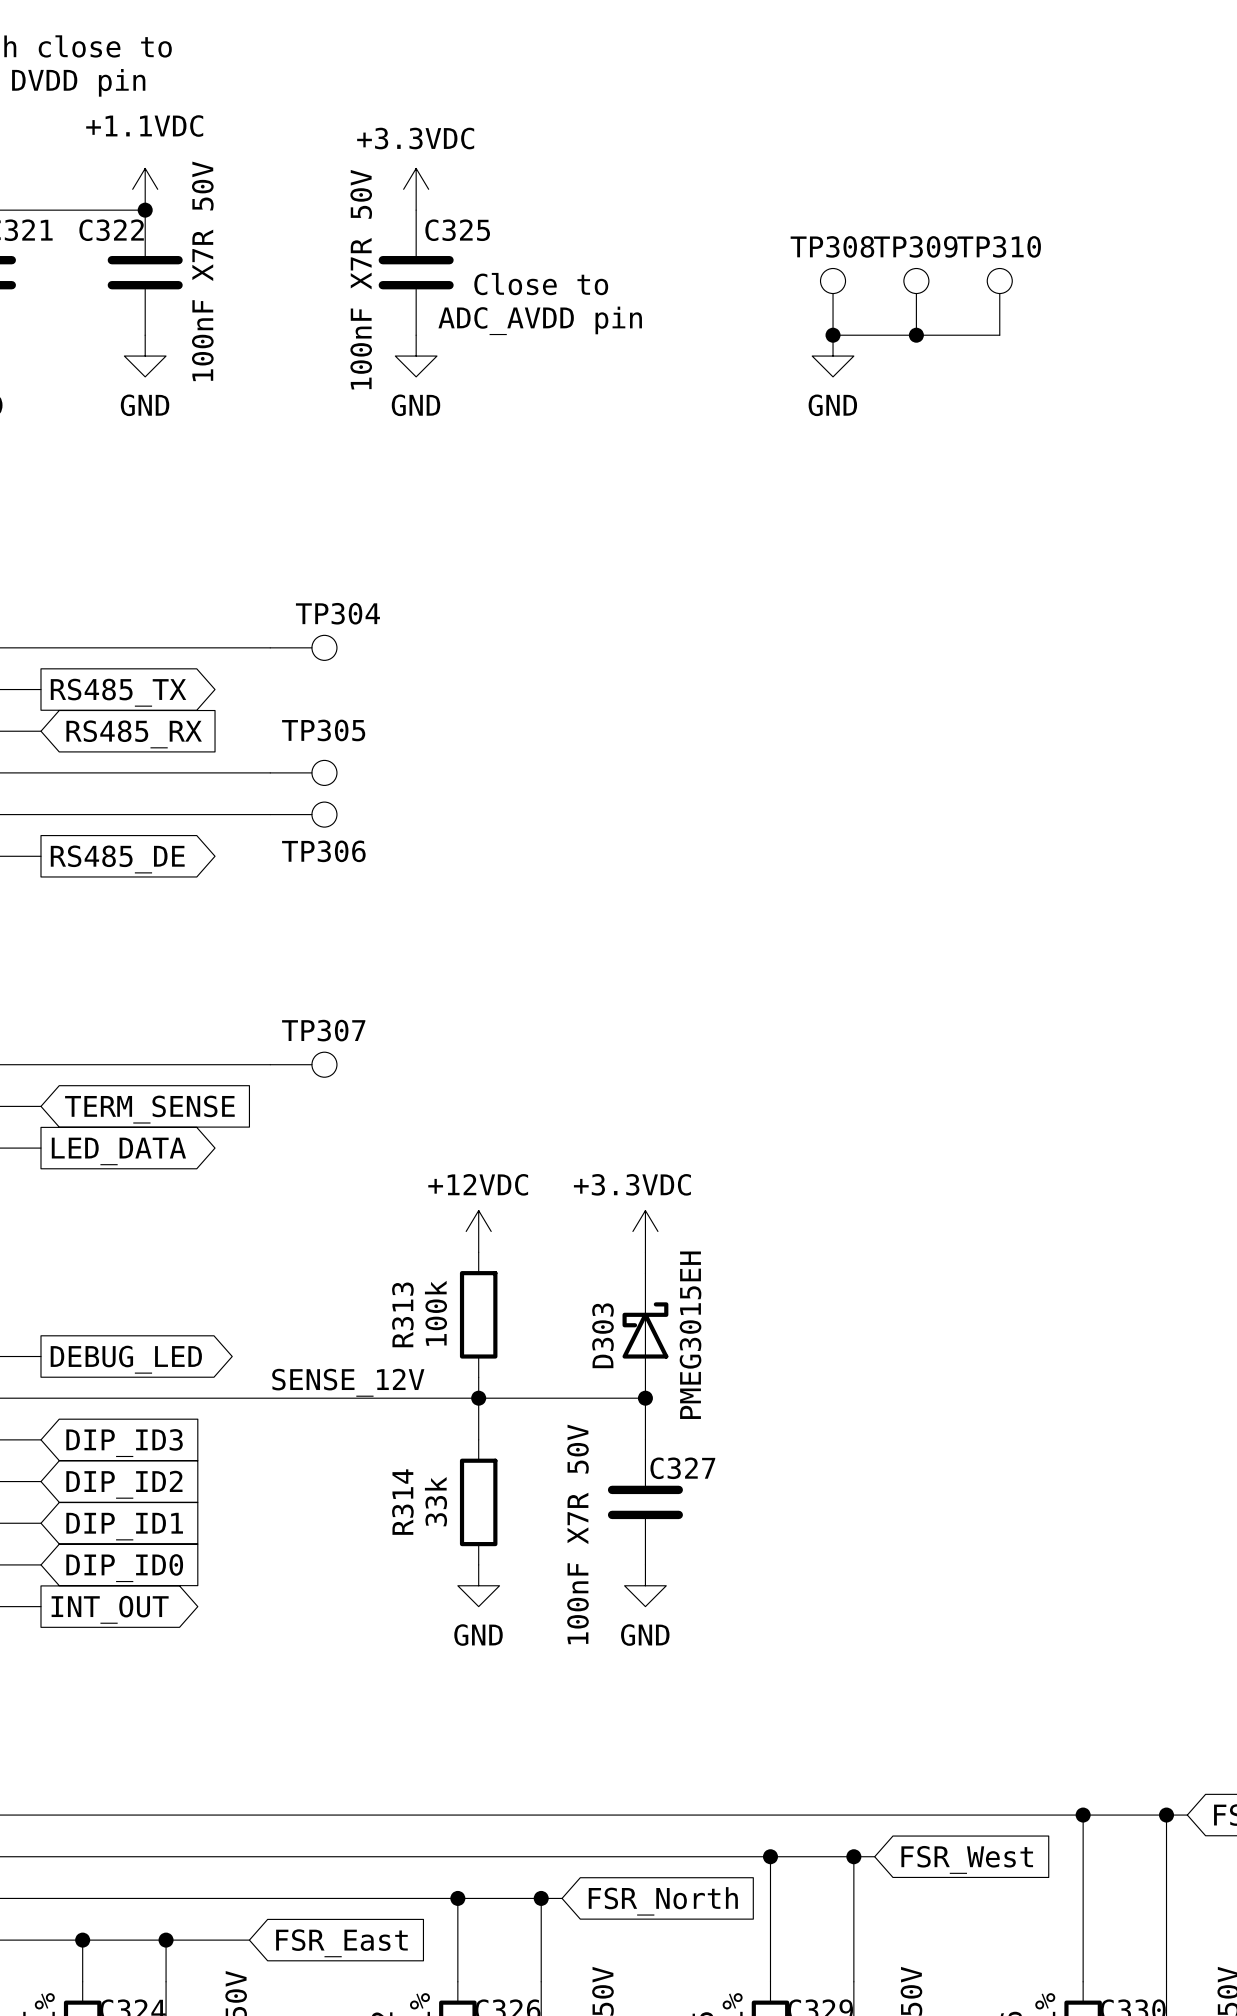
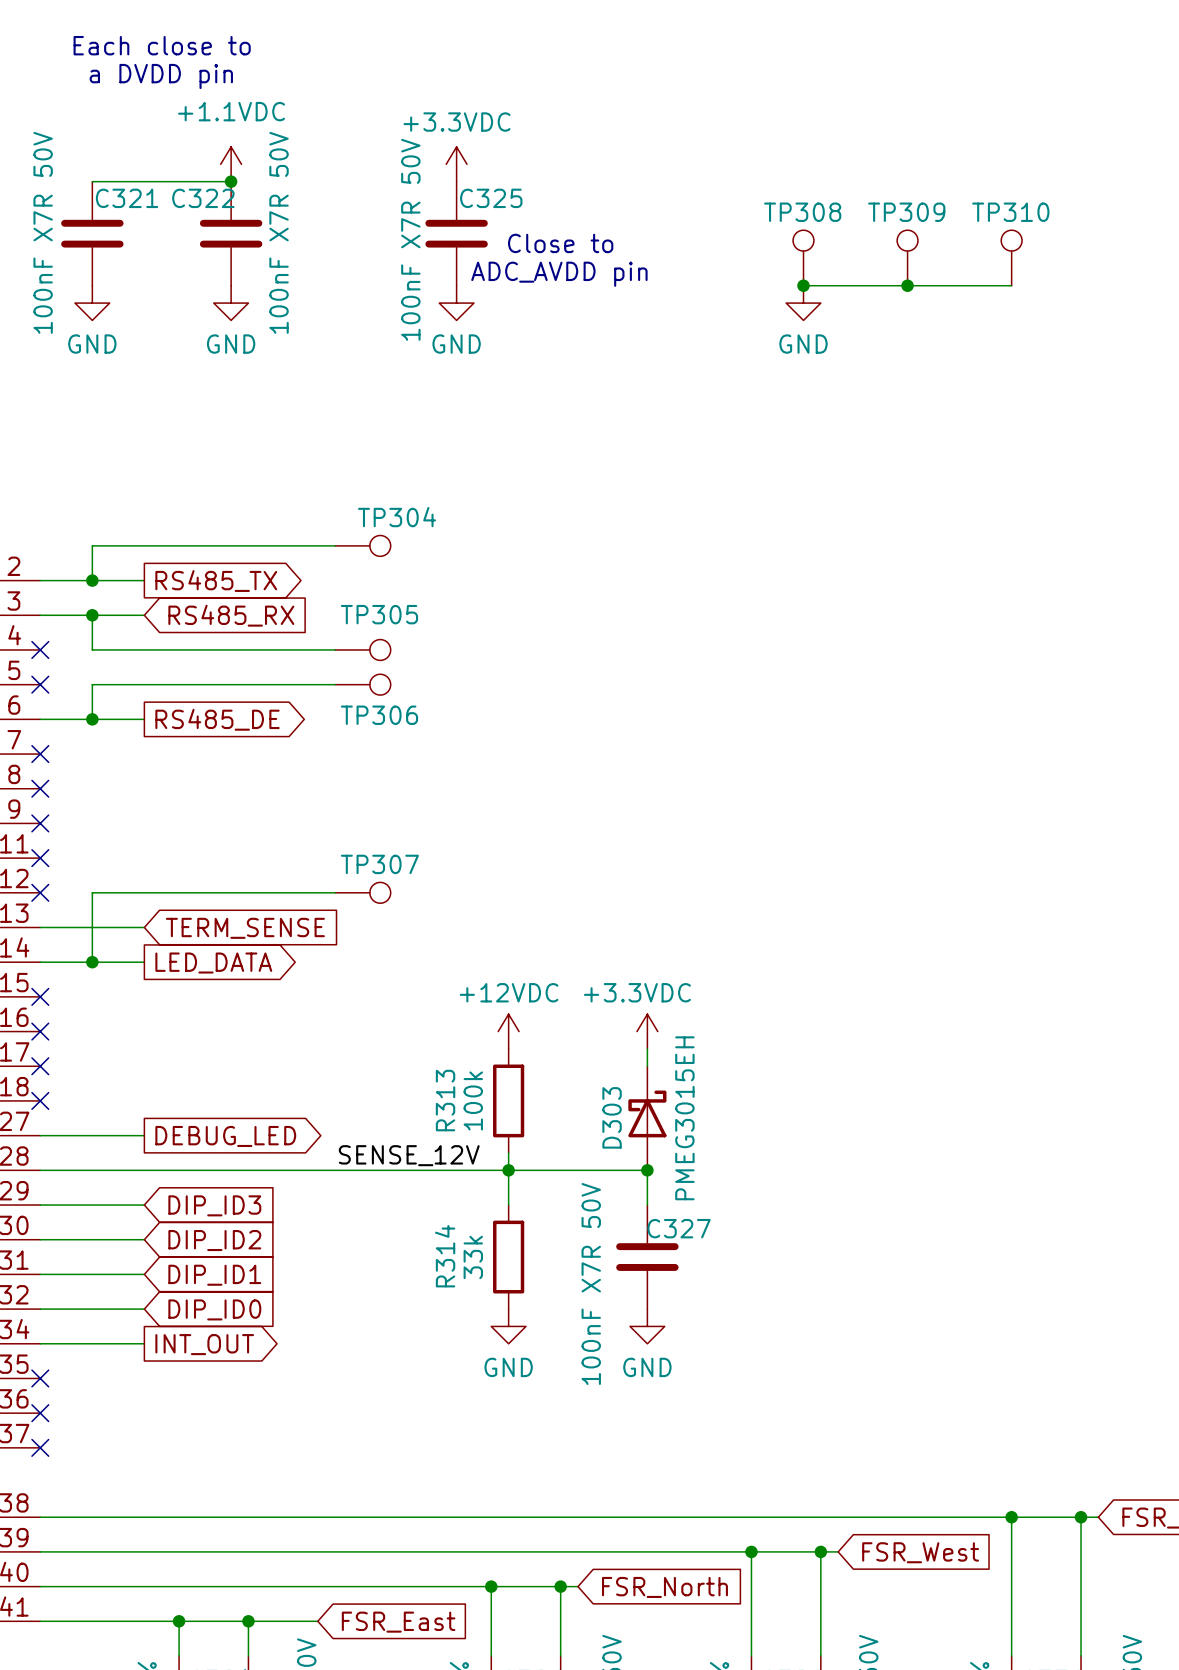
TP309 position: (916, 301) -> (907, 257)
TP310 position: (999, 301) -> (1011, 257)
junction position: (916, 335) -> (907, 285)
wire: none -> (942, 285) (1011, 285)

